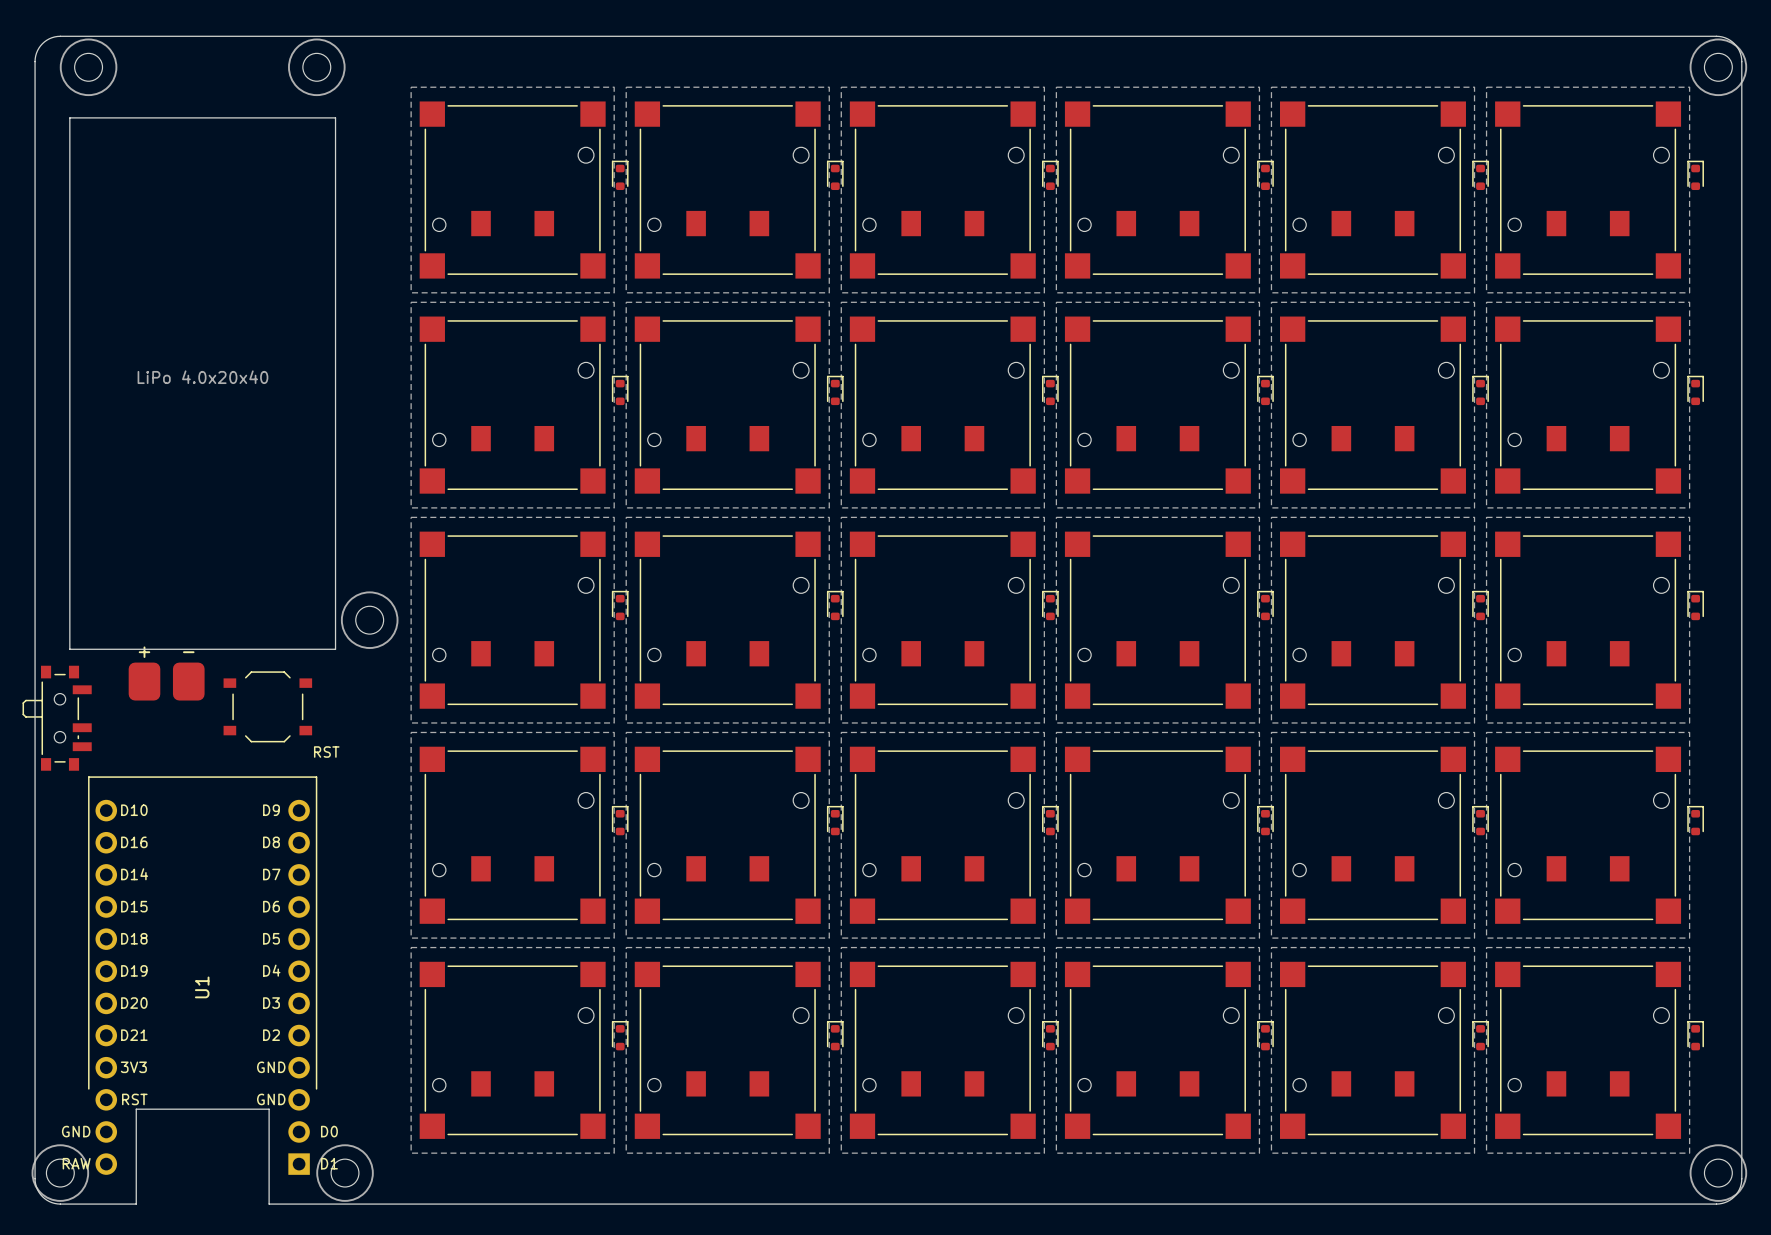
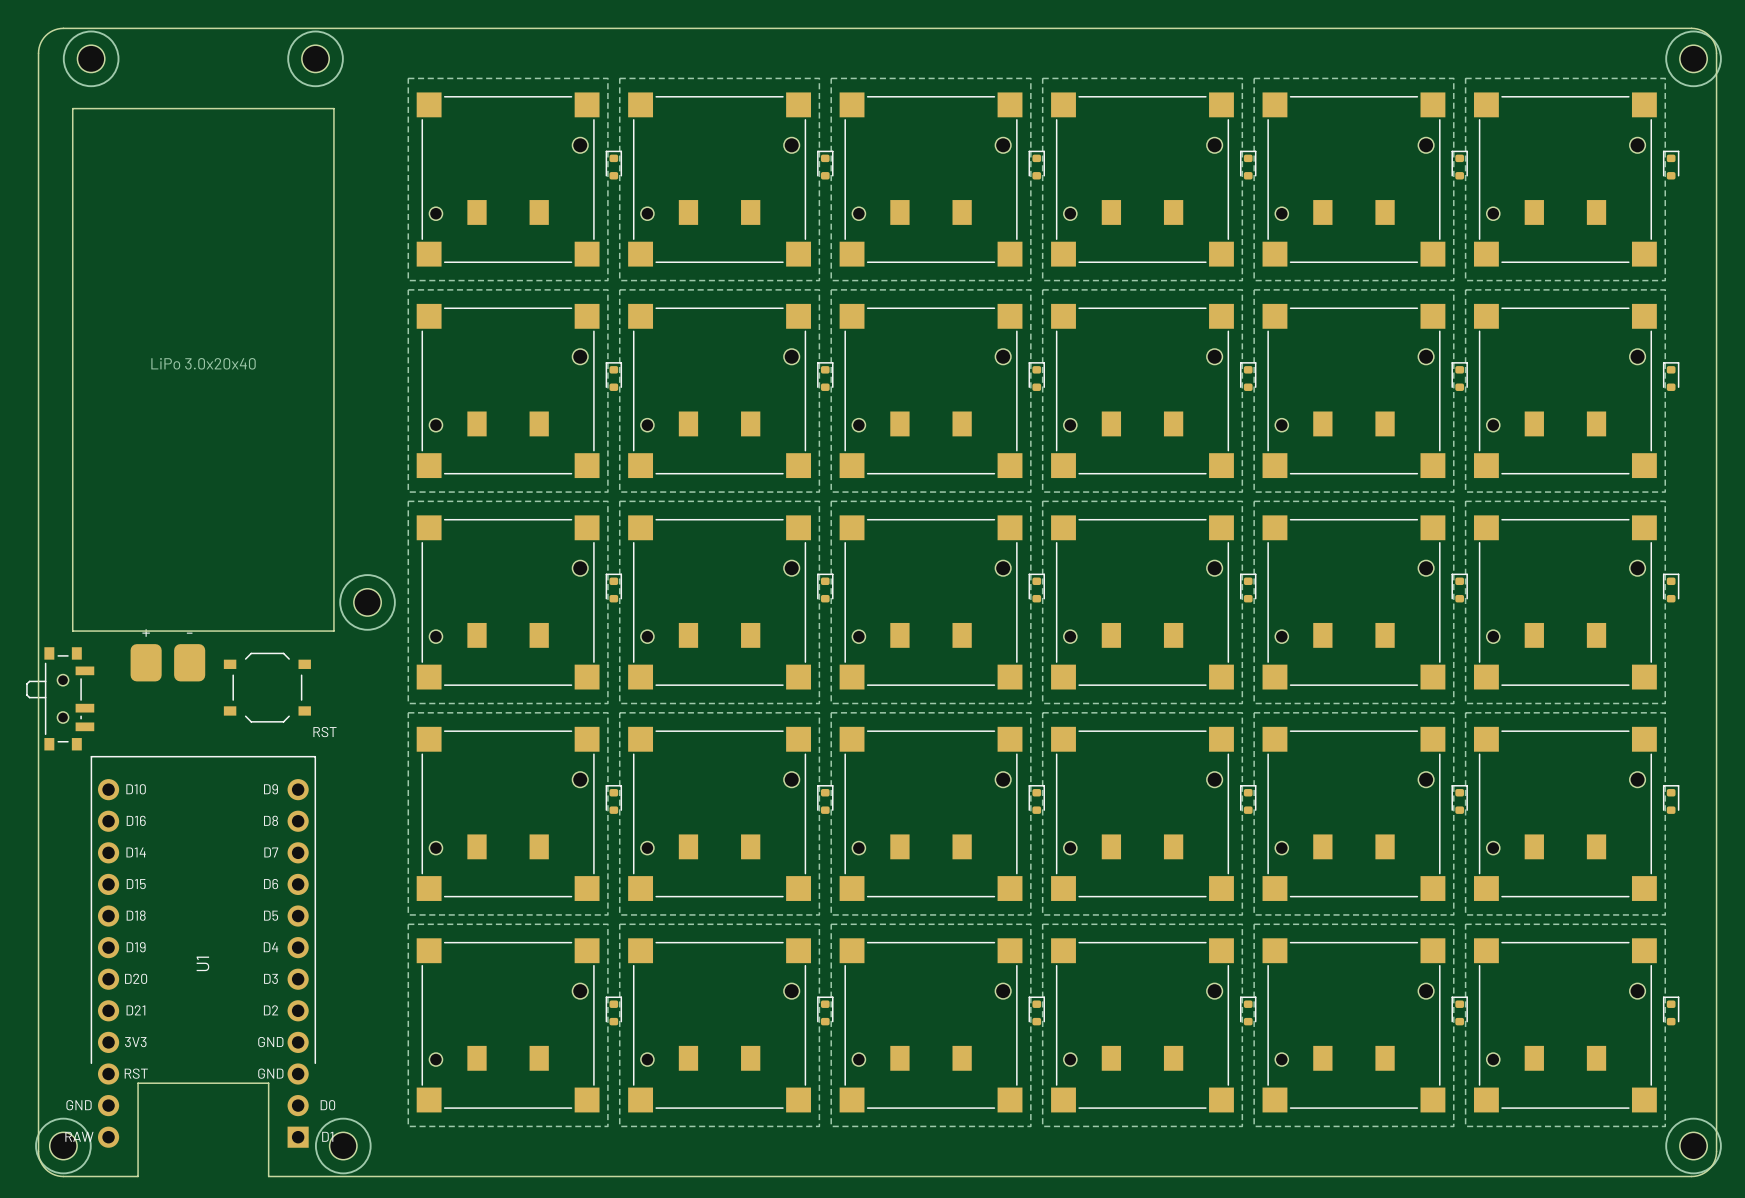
text: LiPo 4.0x20x40 (202, 377) -> LiPo 3.0x20x40 (203, 363)

